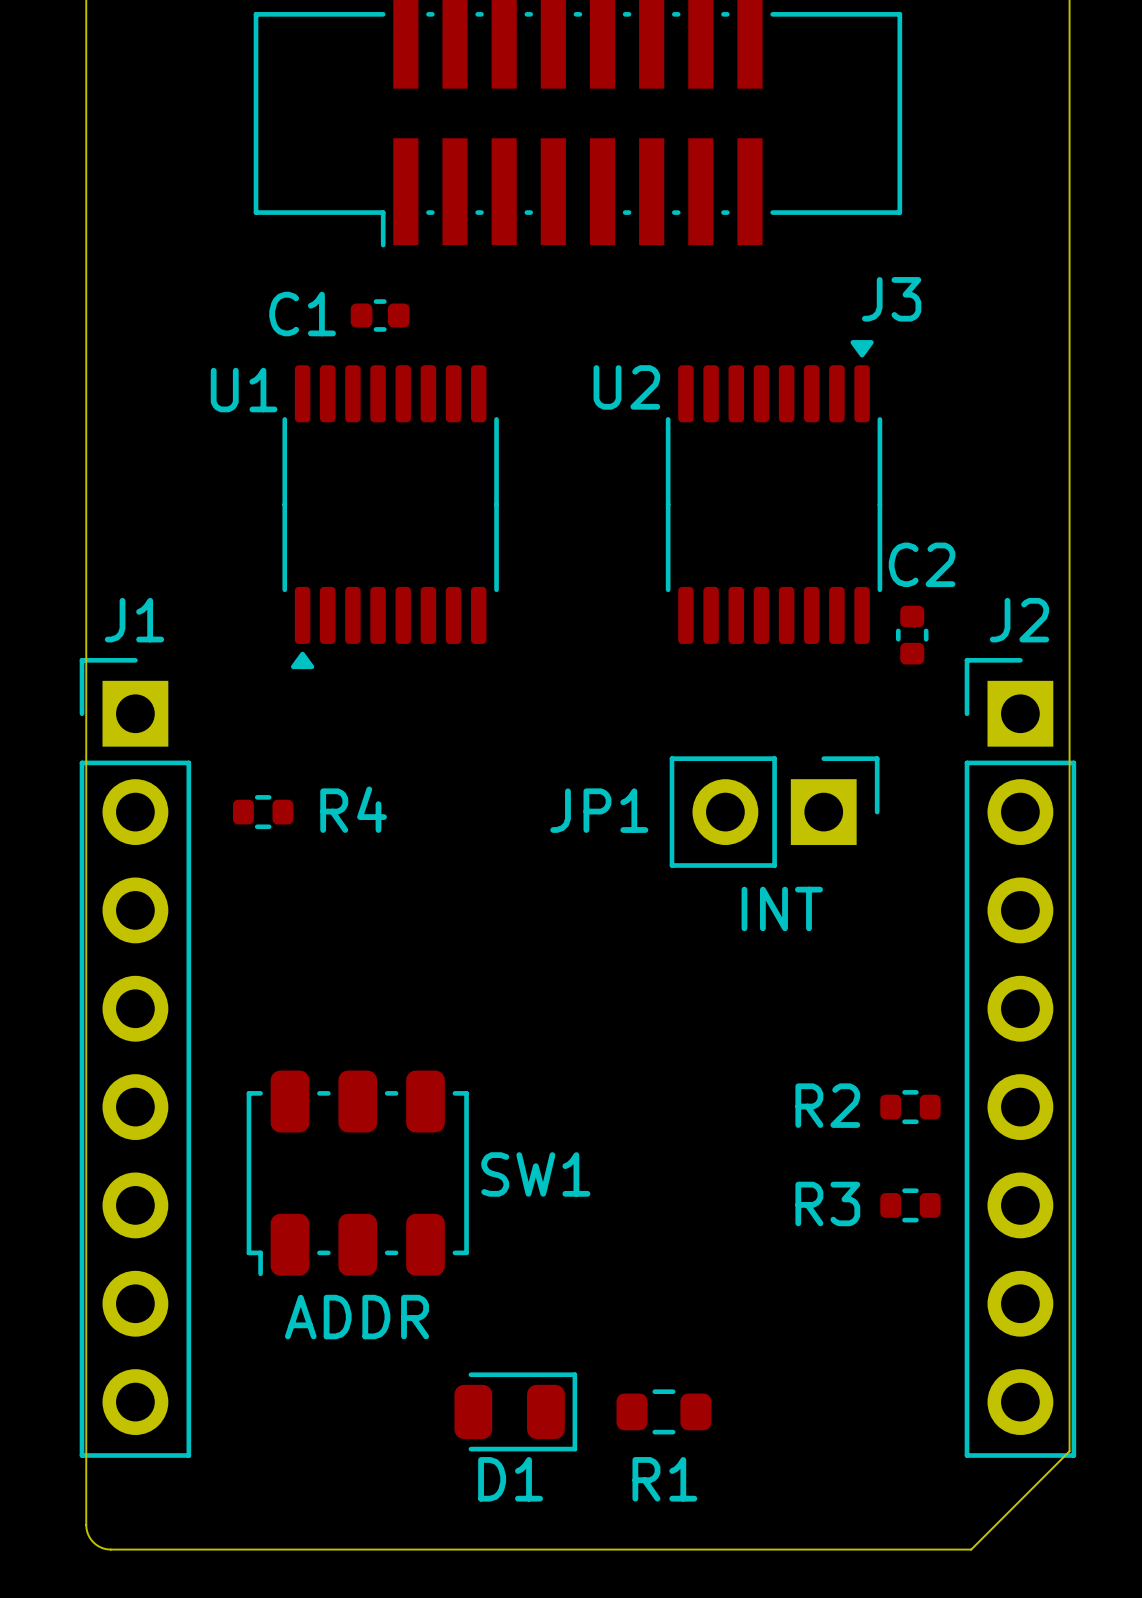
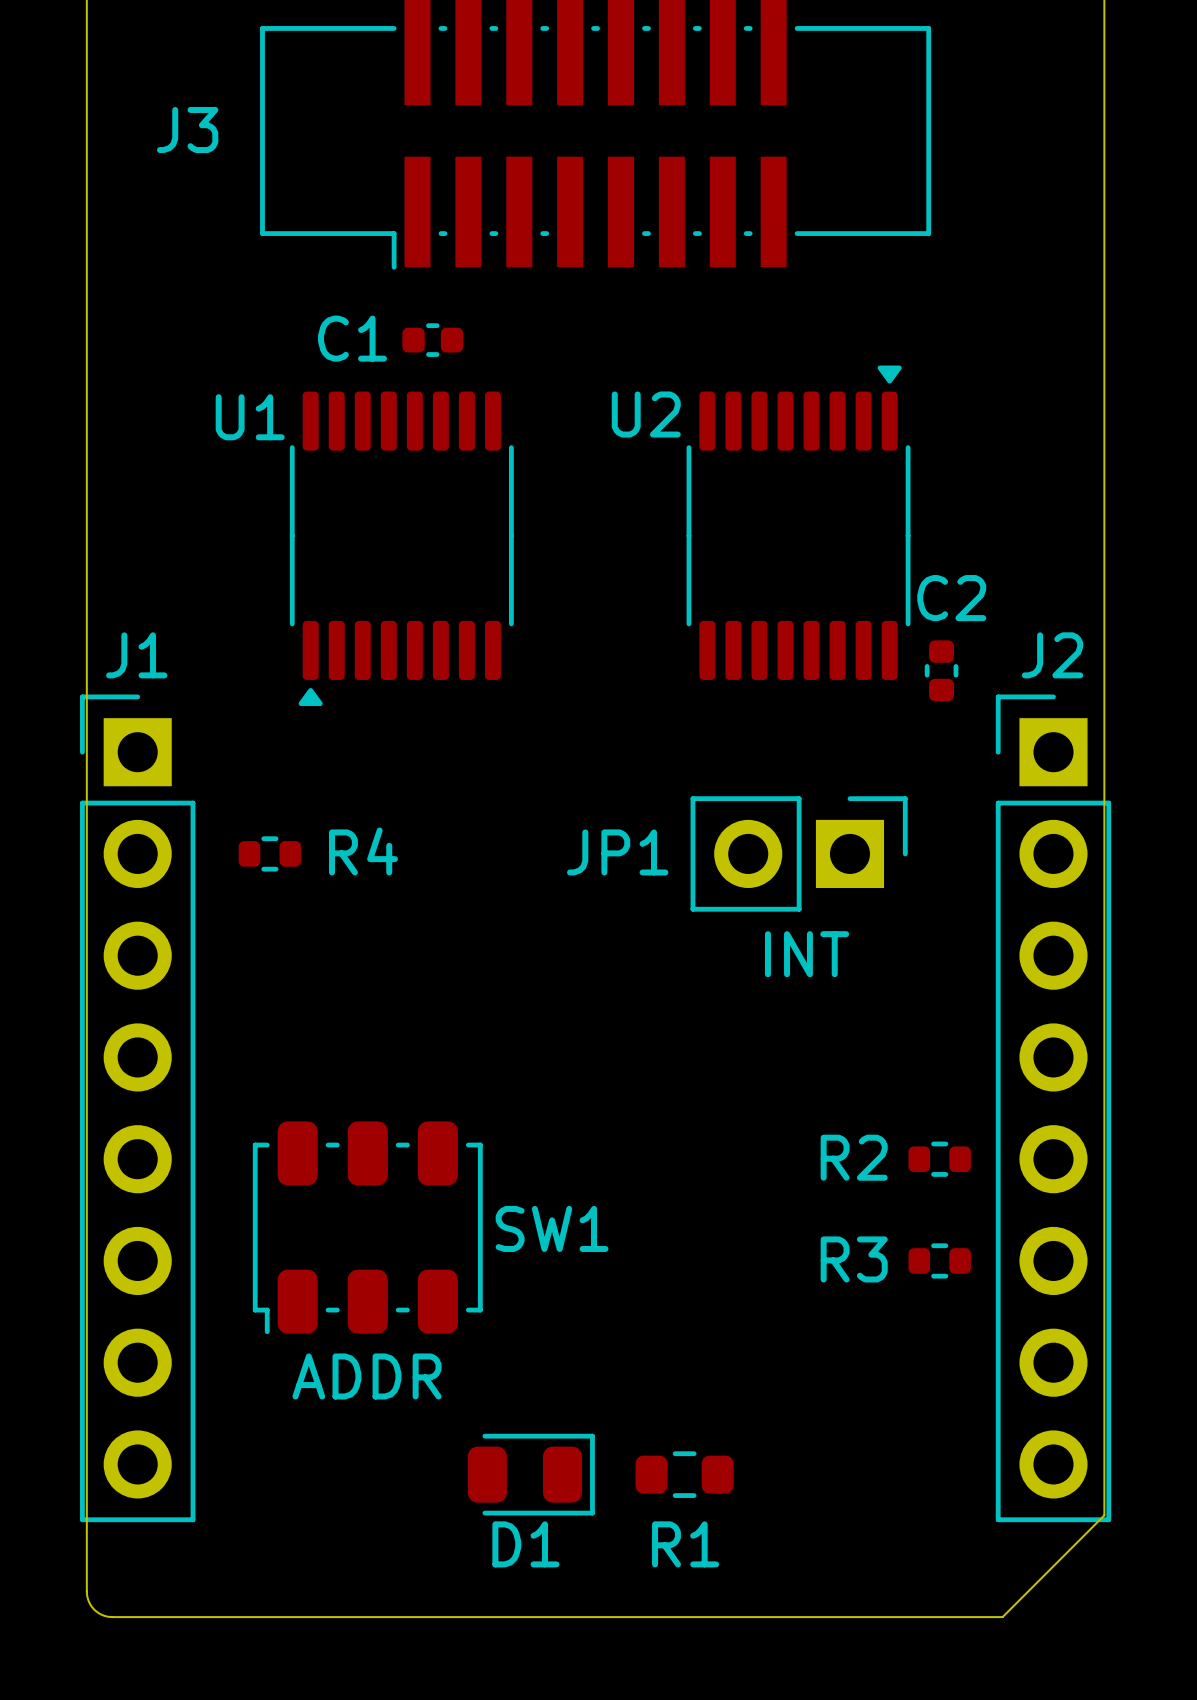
J3 name position: J3 (891, 299) -> J3 (187, 129)
C1 position: (380, 315) -> (432, 340)

